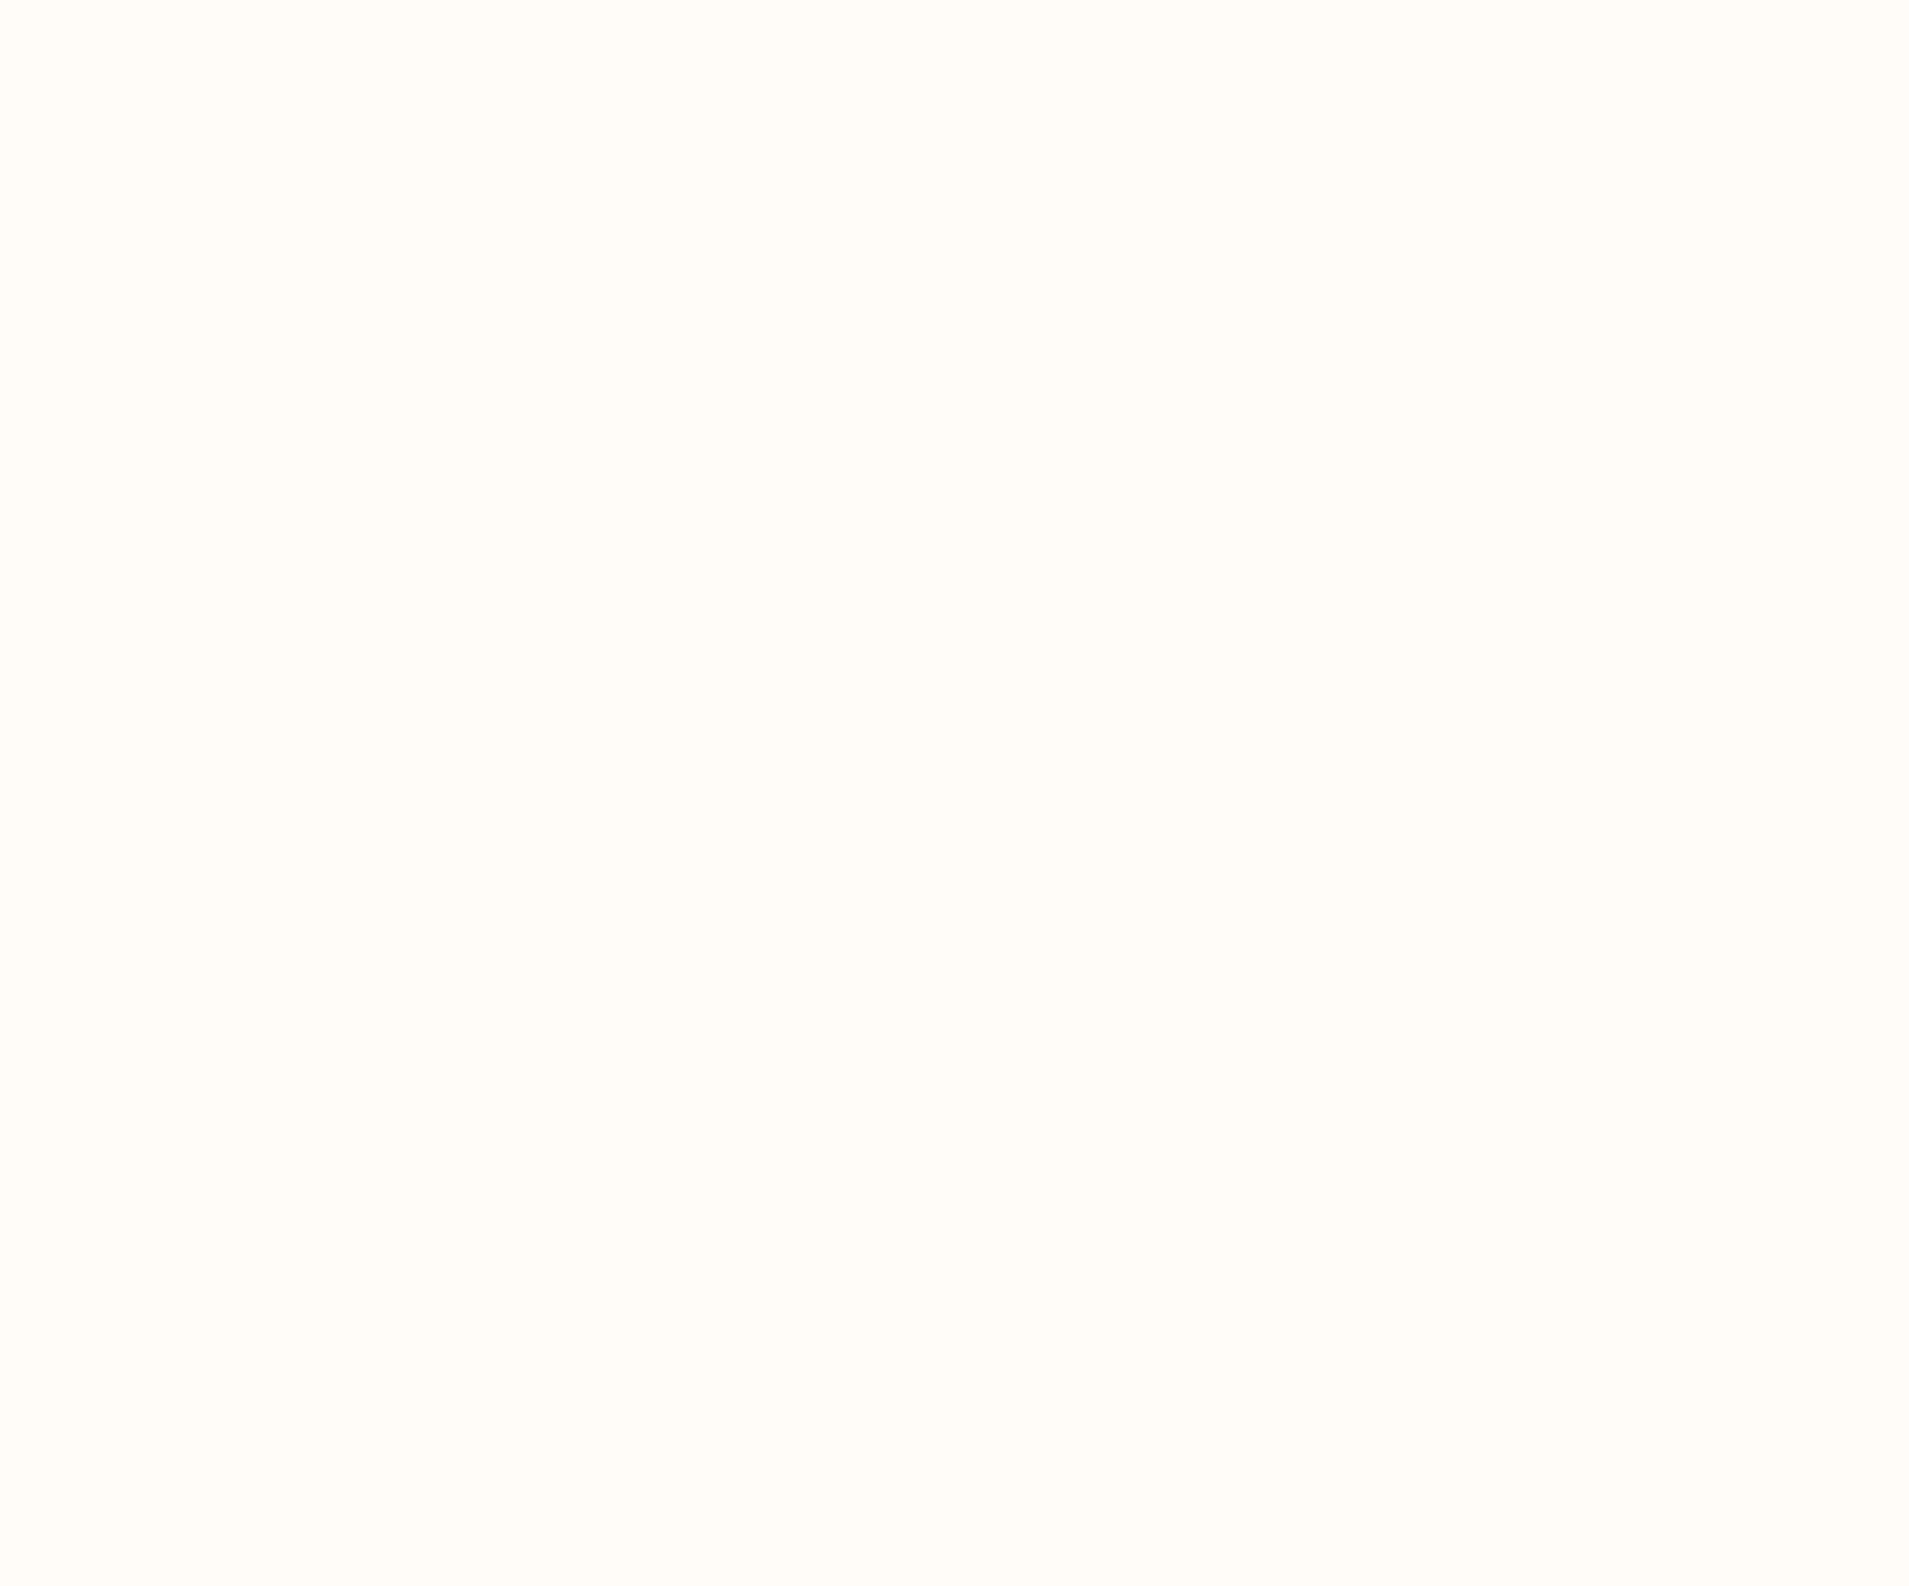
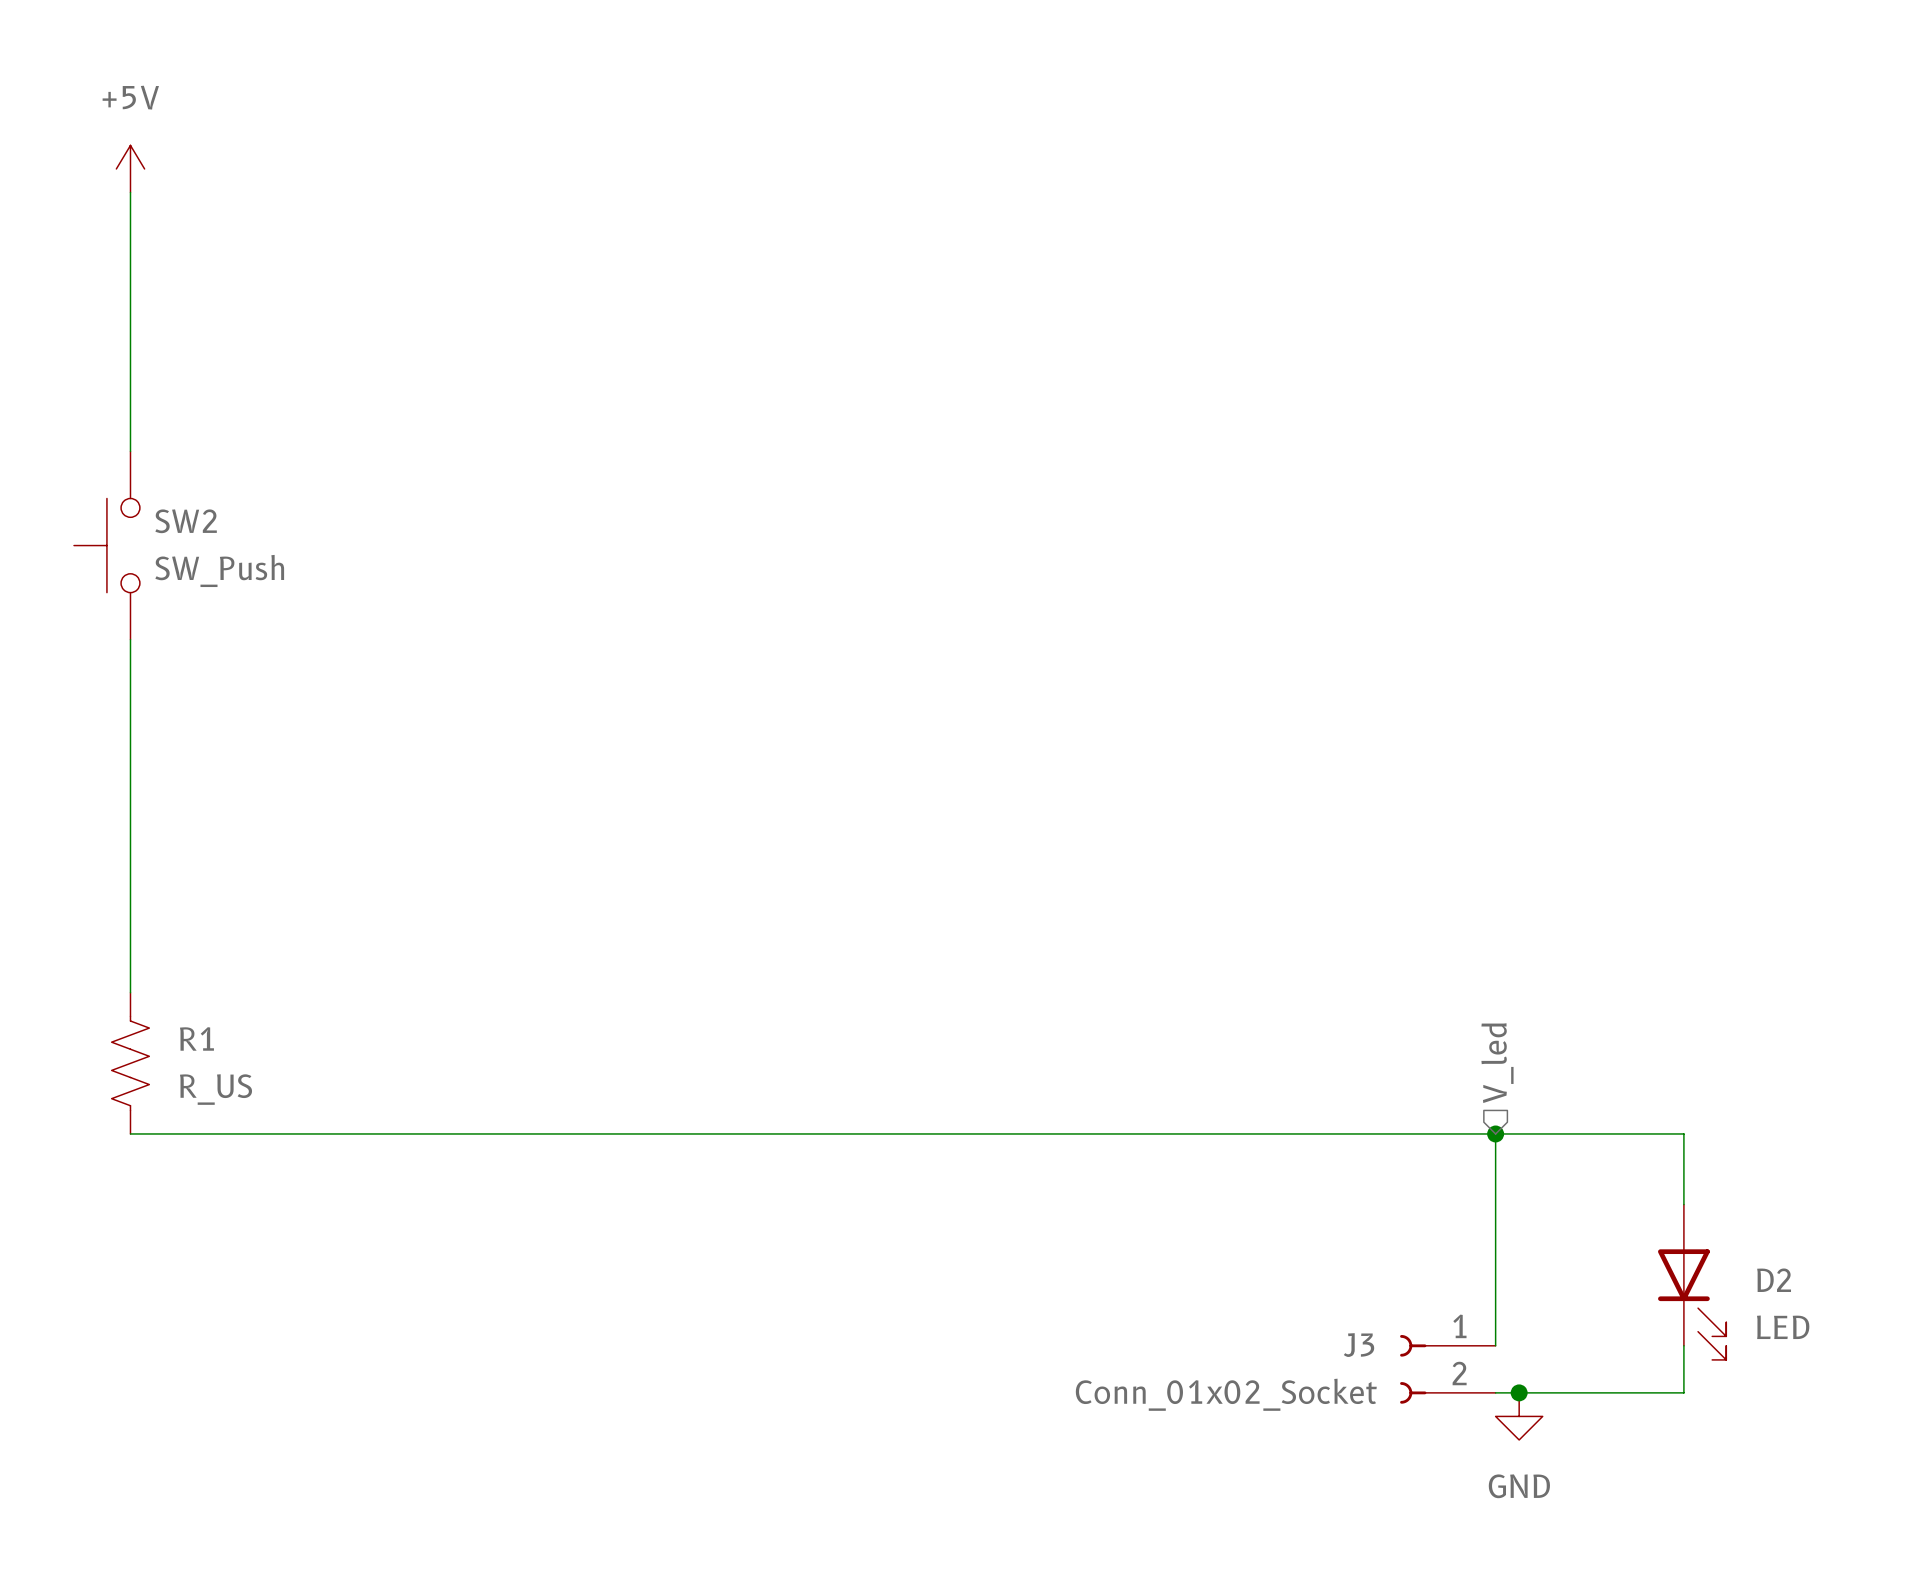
power symbol: none -> +5V (130, 168)
wire: none -> (130, 192) (130, 451)
SW2: none -> SW_Push (106, 545)
wire: none -> (130, 639) (130, 992)
hierarchical label: none -> V_led (1497, 1063)
R1: none -> R_US (130, 1063)
wire: none -> (130, 1133) (1683, 1133) (1683, 1204)
wire: none -> (1495, 1133) (1495, 1345)
junction: none -> (1495, 1133)
D2: none -> LED (1692, 1282)
wire: none -> (1683, 1345) (1683, 1392) (1495, 1392)
J3: none -> Conn_01x02_Socket (1447, 1369)
junction: none -> (1519, 1392)
power symbol: none -> GND (1519, 1416)

